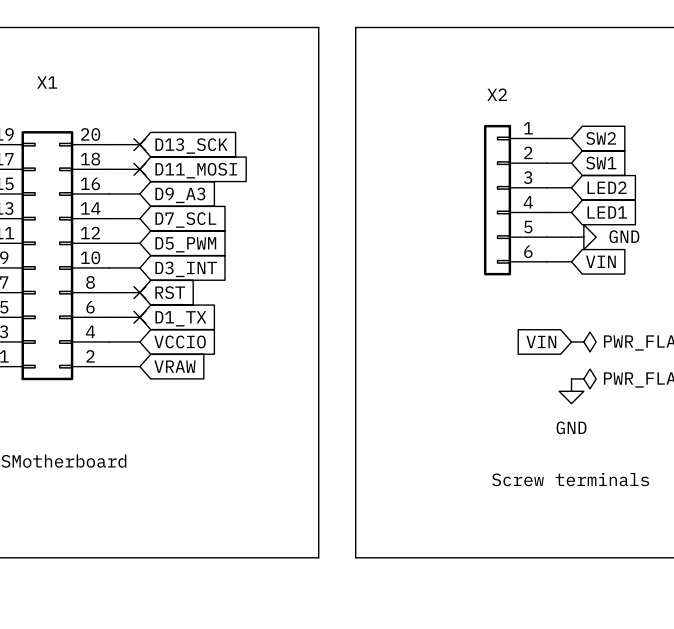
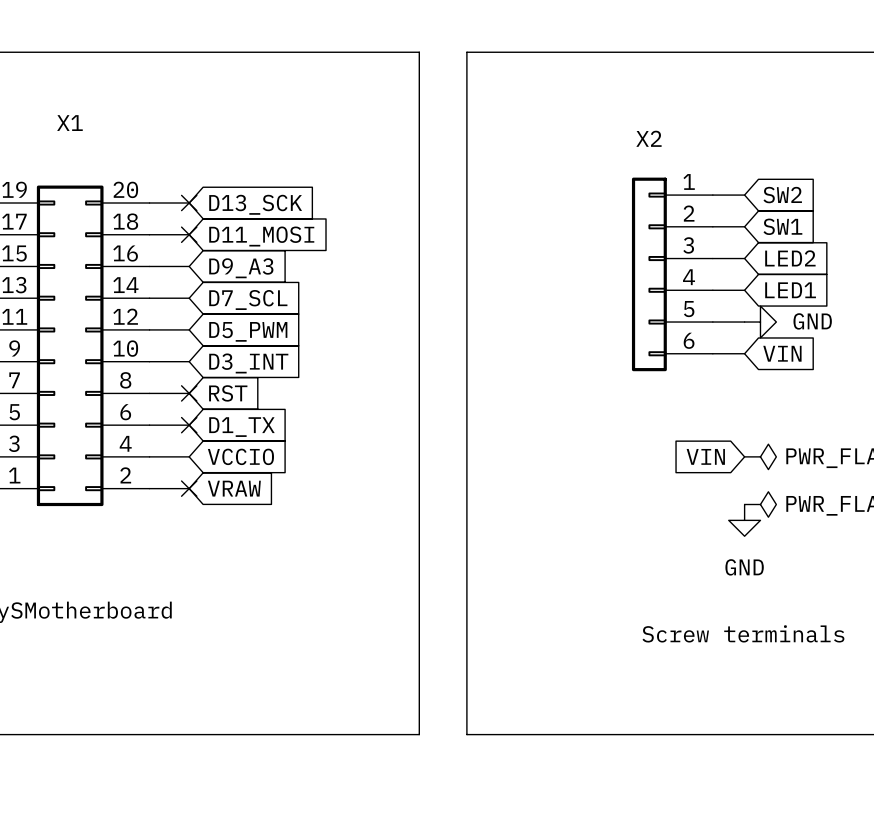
no-connect mark: none -> (189, 488)

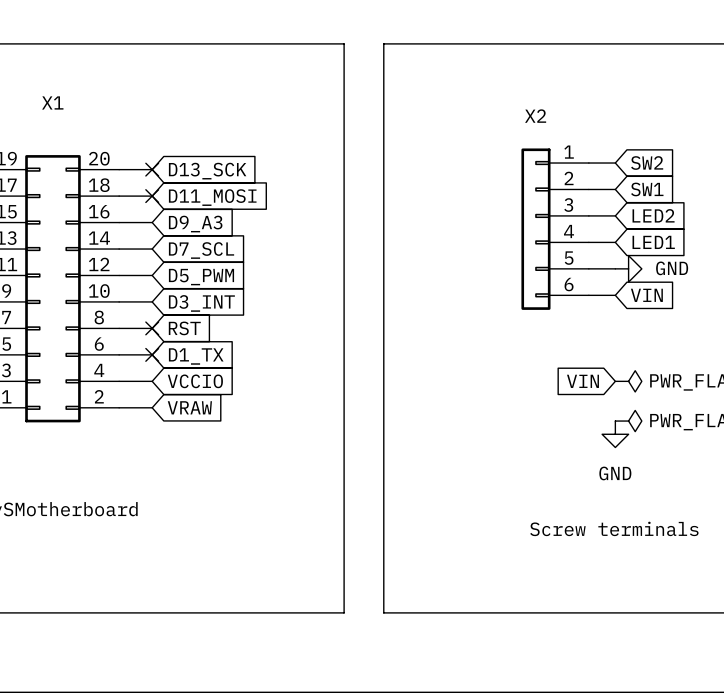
no-connect mark: (189, 488) -> none

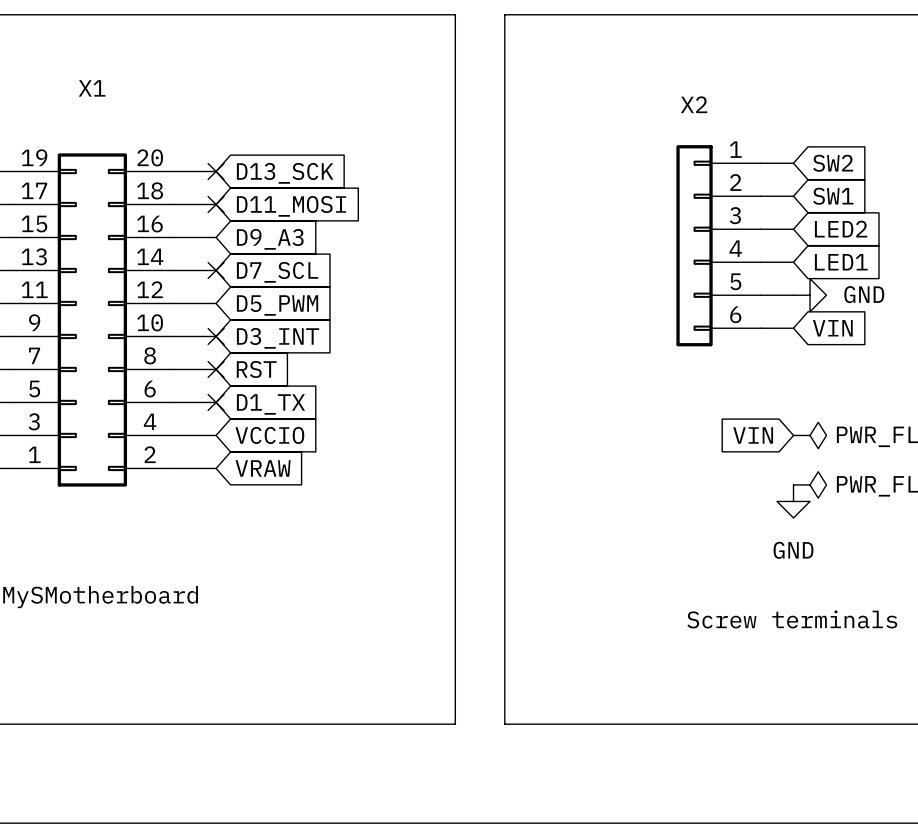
no-connect mark: none -> (216, 270)
no-connect mark: none -> (216, 336)

